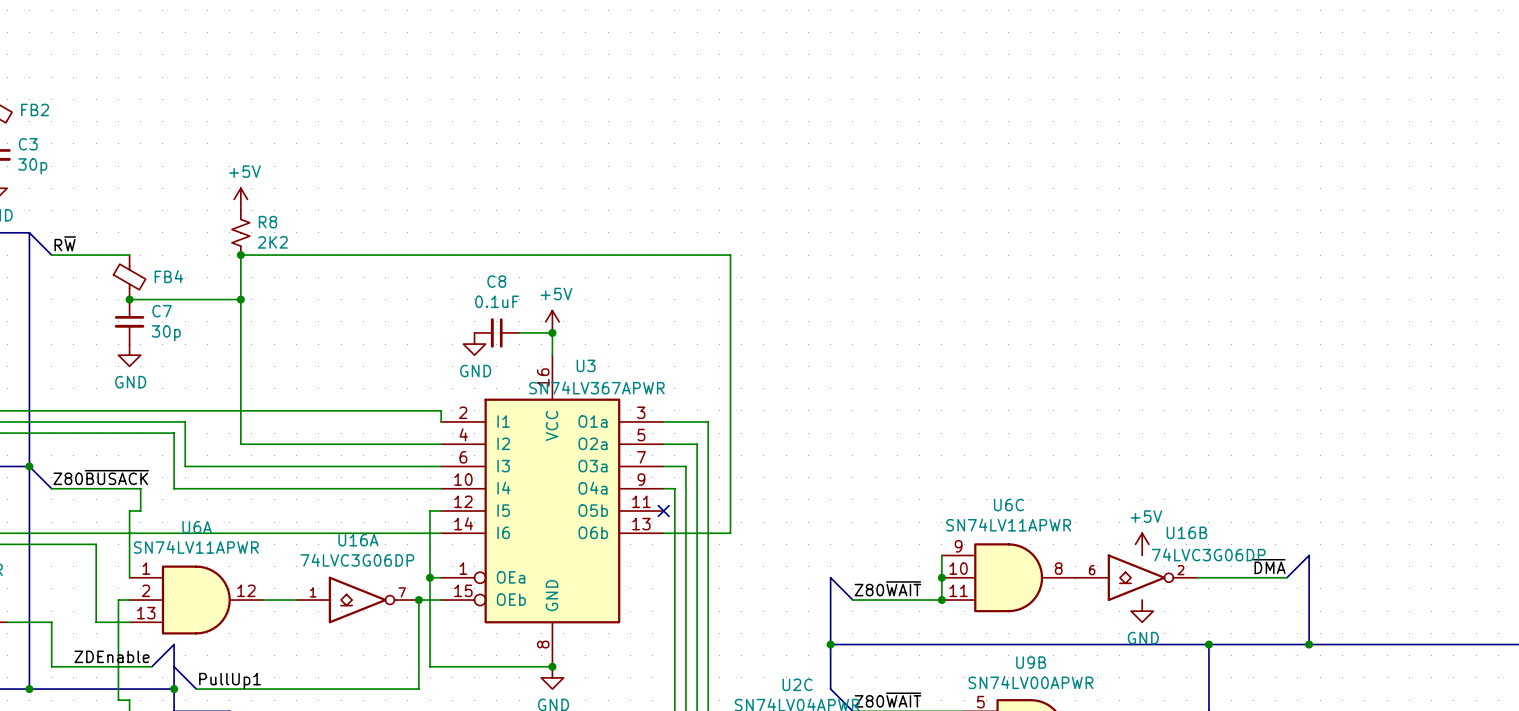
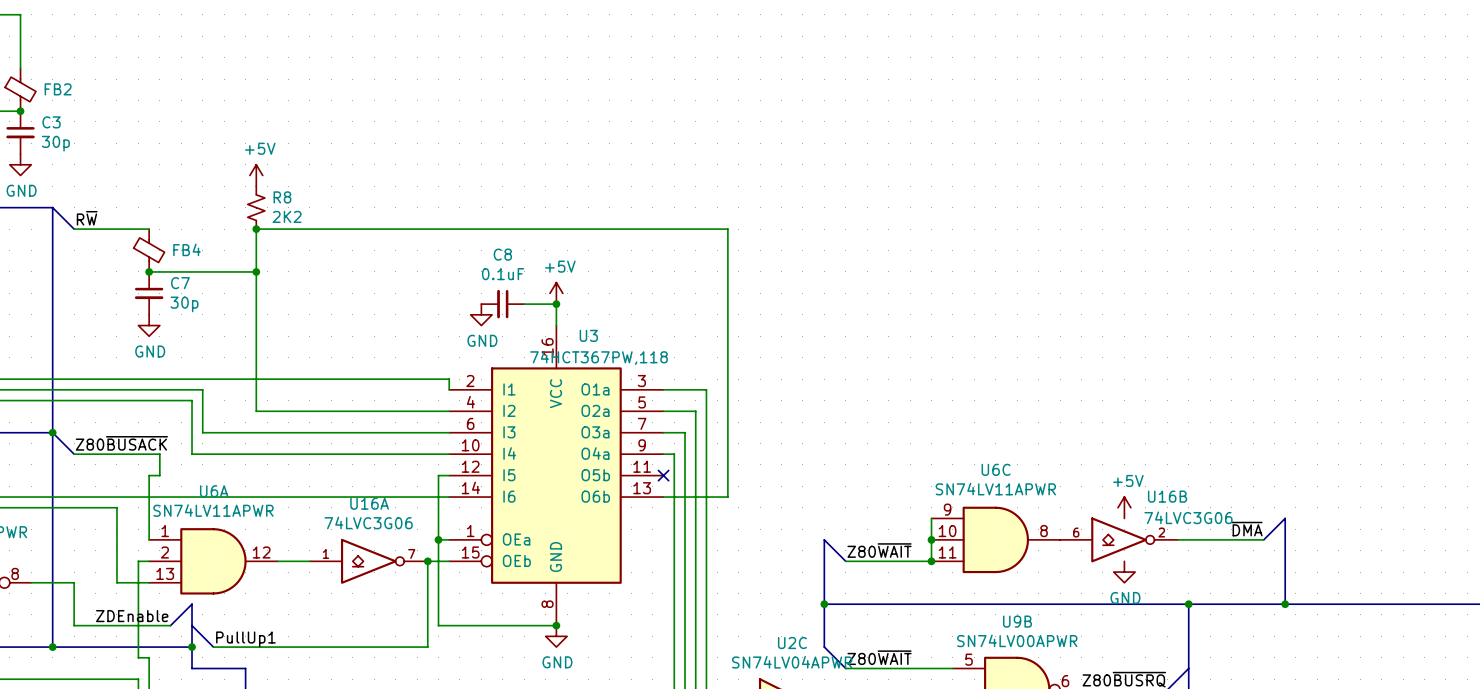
U3 value: SN74LV367APWR (596, 387) -> 74HCT367PW,118 (599, 357)
U16B value: 74LVC3G06DP (1208, 554) -> 74LVC3G06 (1188, 517)
U16A value: 74LVC3G06DP (357, 560) -> 74LVC3G06 (368, 522)

